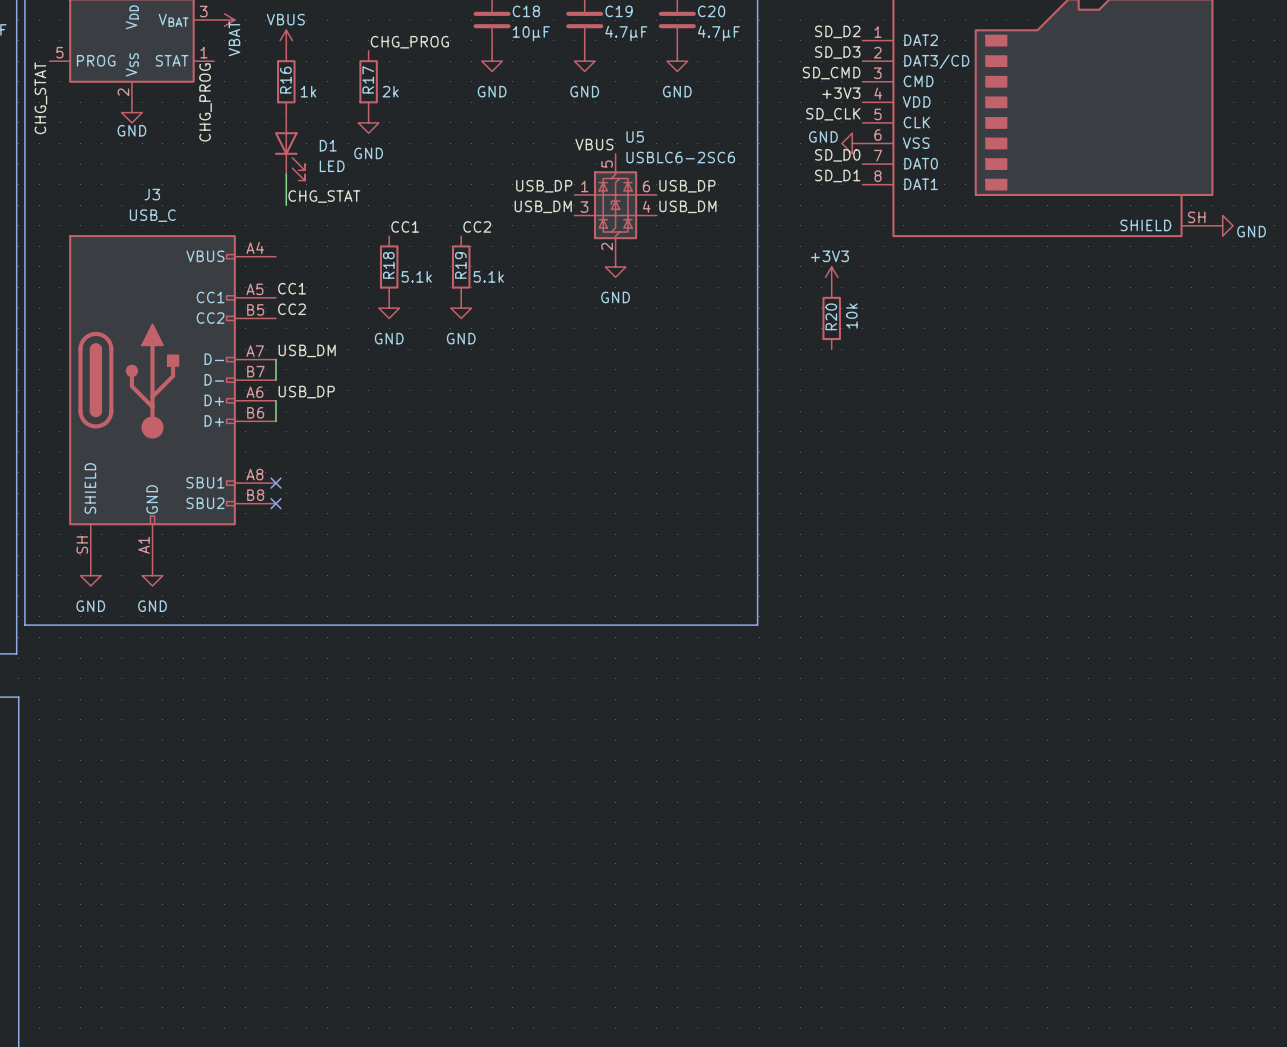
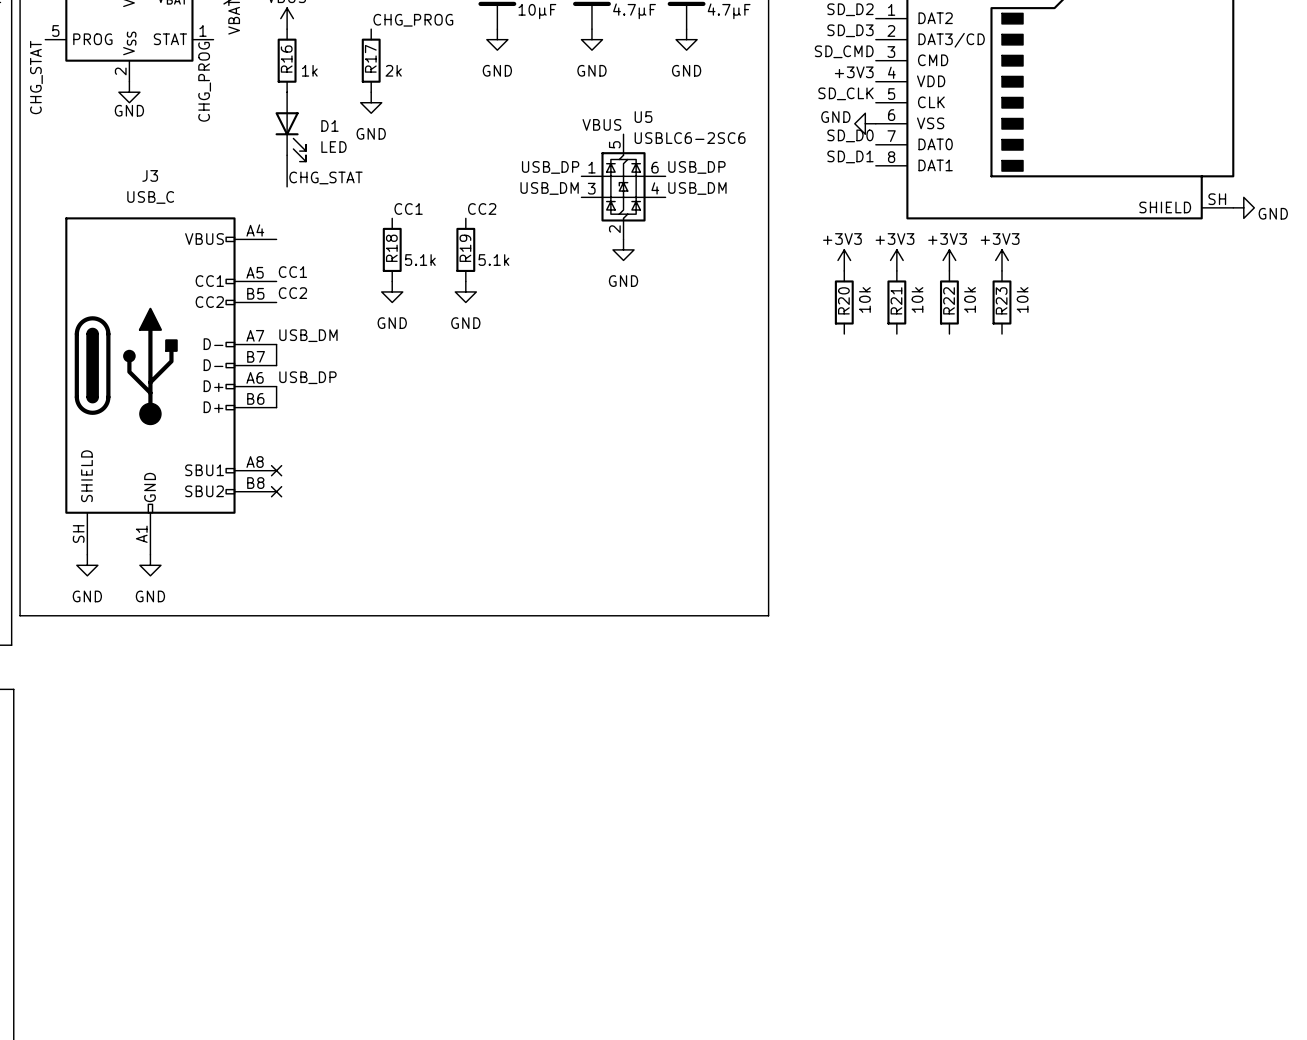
power symbol: none -> +3V3 (896, 260)
power symbol: none -> +3V3 (949, 260)
power symbol: none -> +3V3 (1001, 260)
R21: none -> 10k (896, 302)
R22: none -> 10k (949, 302)
R23: none -> 10k (1001, 302)

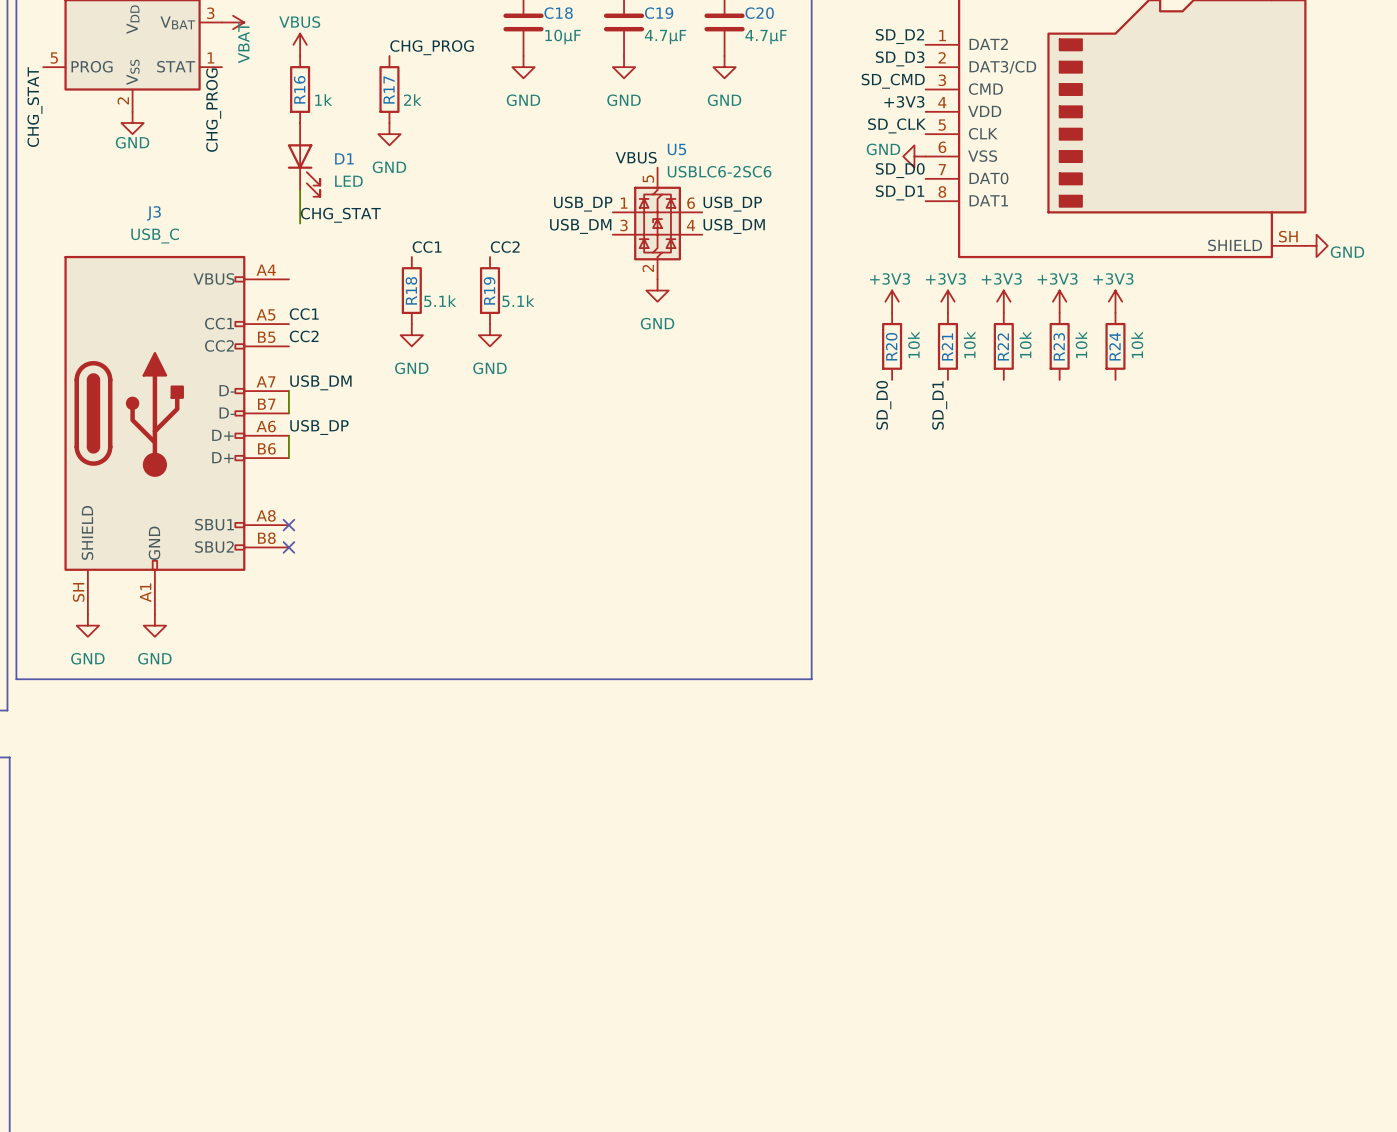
power symbol: none -> +3V3 (1115, 301)
R24: none -> 10k (1115, 346)
label: none -> SD_D0 (883, 405)
label: none -> SD_D1 (939, 405)

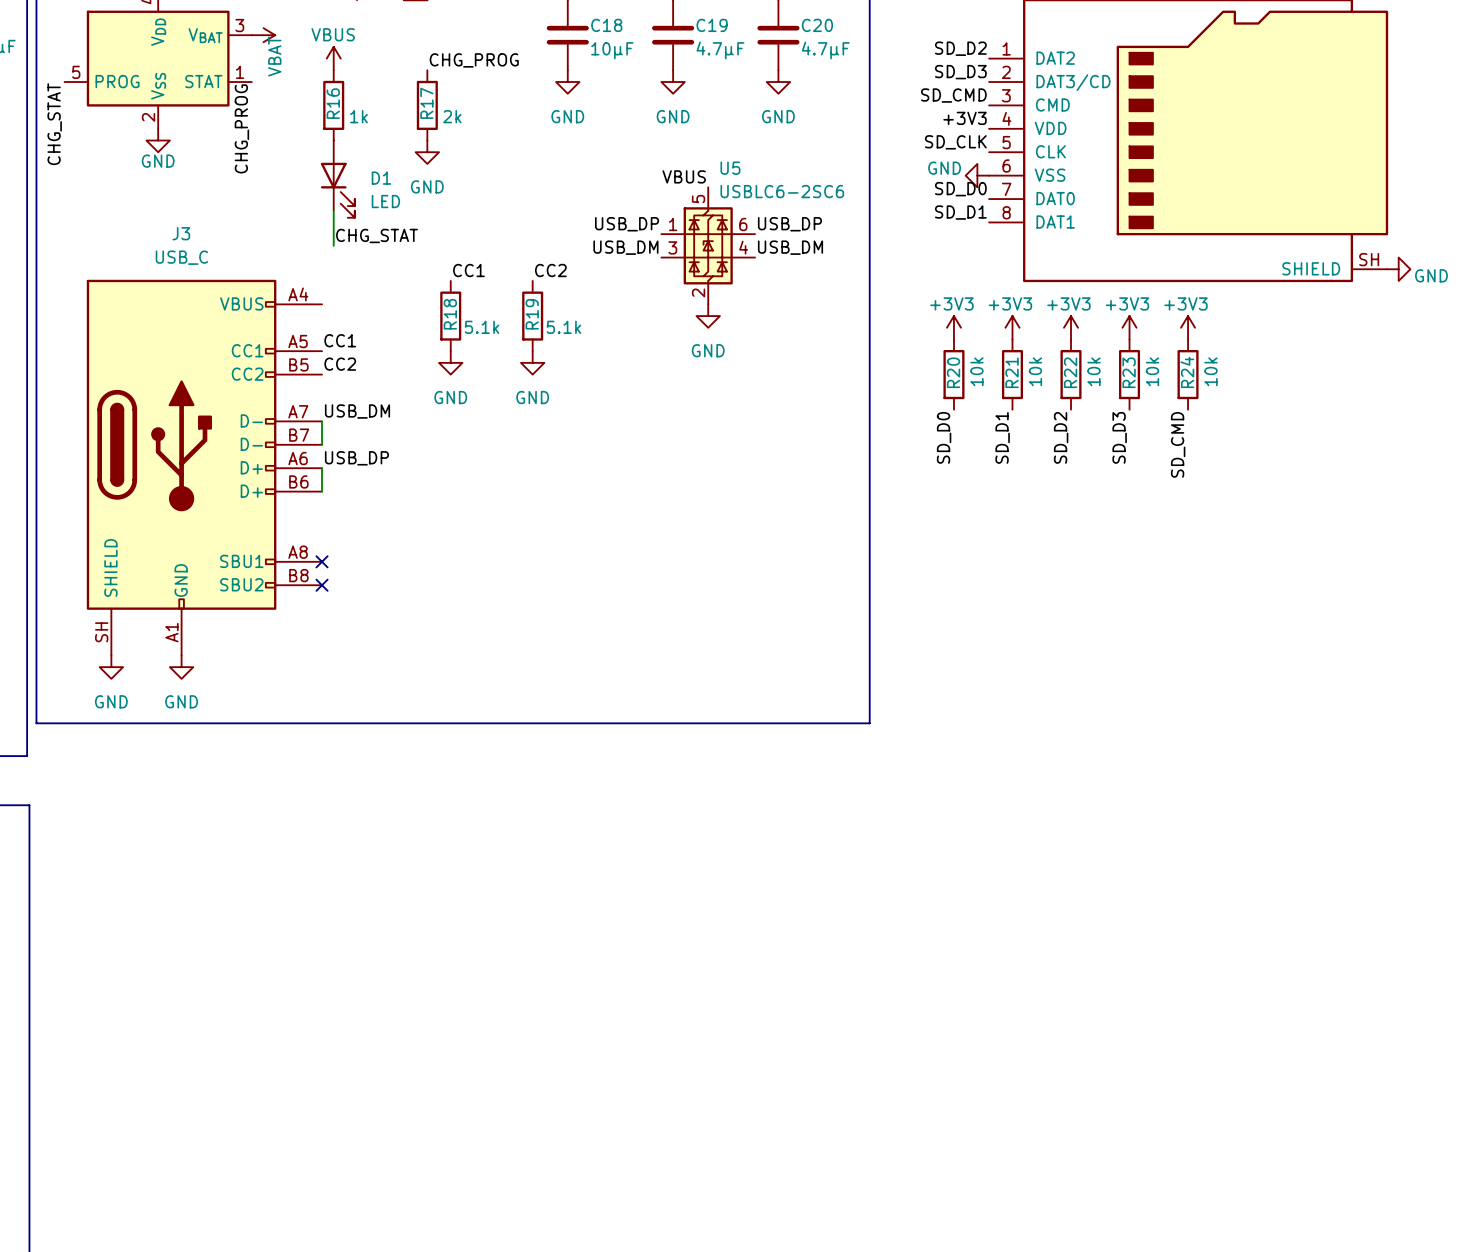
label: none -> SD_D2 (1061, 437)
label: none -> SD_D3 (1119, 437)
label: none -> SD_CMD (1178, 444)

